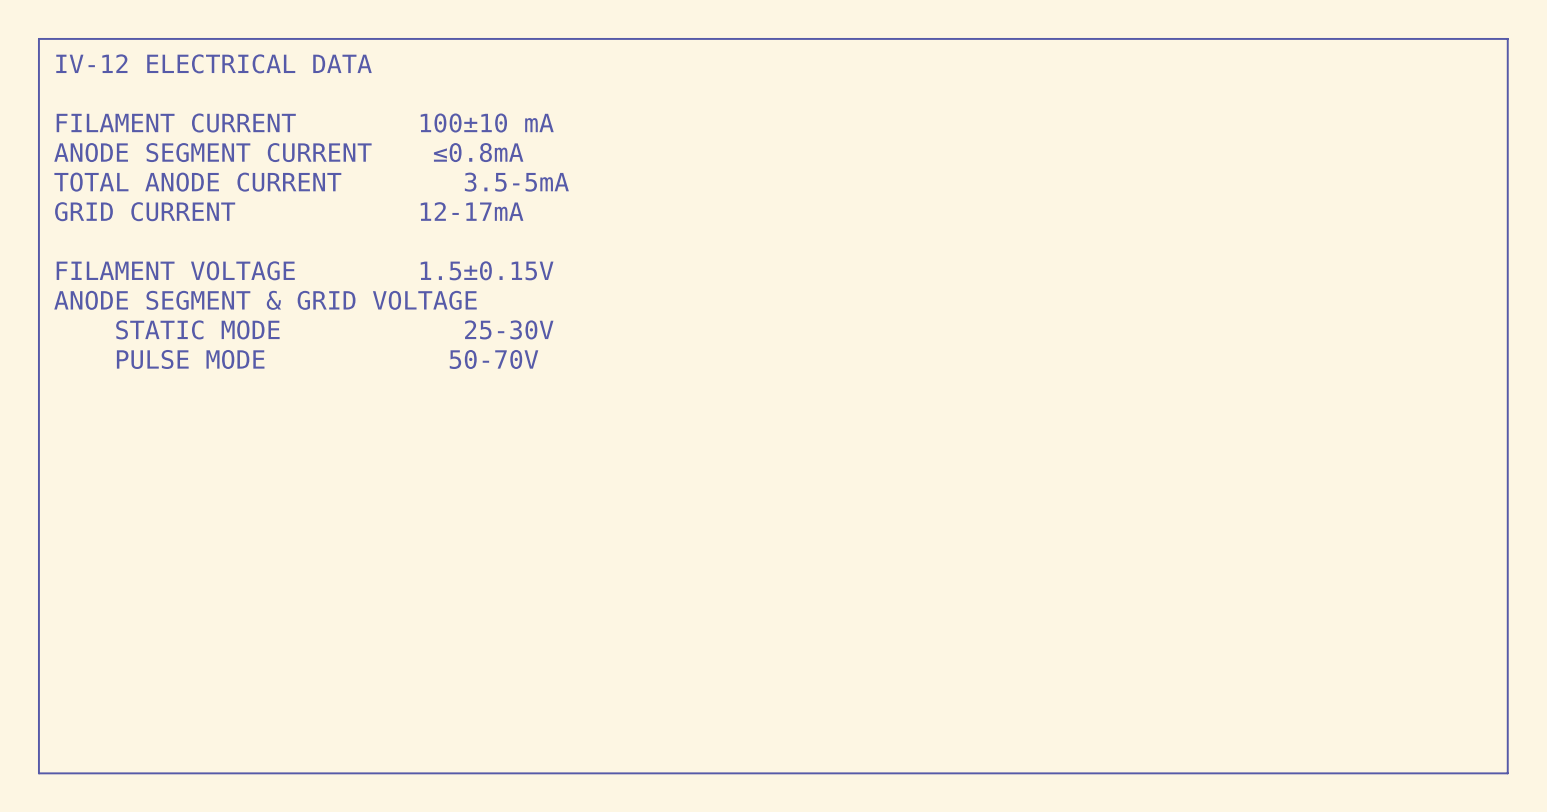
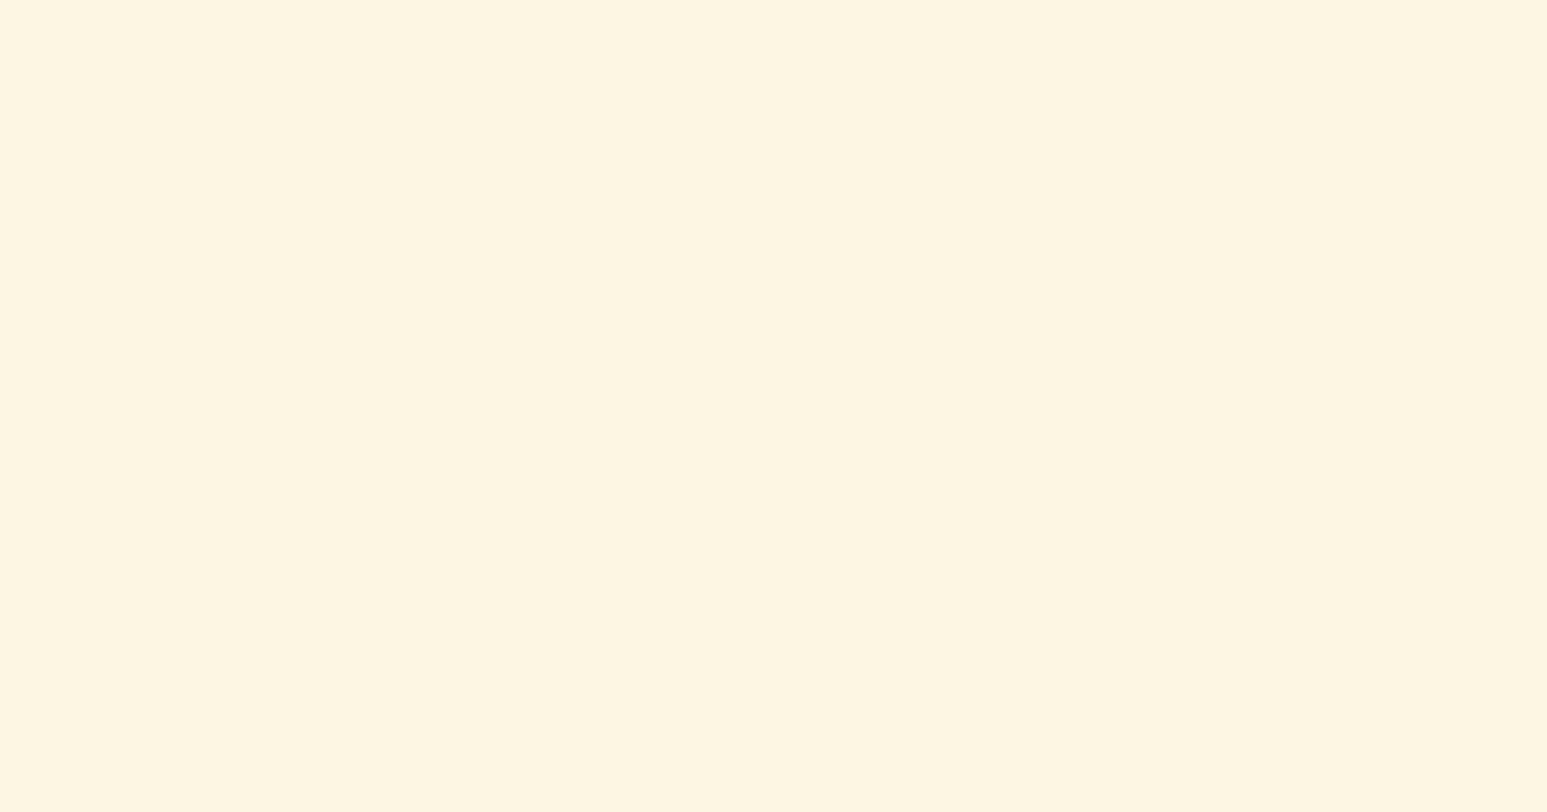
line: (38, 38) (1507, 38) (1507, 773) (38, 773) (38, 38) -> none
text: IV-12 ELECTRICAL DATA (214, 63) -> none
text: FILAMENT CURRENT 100±10 mA (305, 123) -> none
text: ANODE SEGMENT CURRENT ≤0.8mA (288, 152) -> none
text: TOTAL ANODE CURRENT 3.5-5mA (311, 182) -> none
text: GRID CURRENT 12-17mA (289, 211) -> none
text: FILAMENT VOLTAGE 1.5±0.15V (305, 270) -> none
text: ANODE SEGMENT & GRID VOLTAGE (265, 300) -> none
text: STATIC MODE 25-30V (334, 329) -> none
text: PULSE MODE 50-70V (327, 359) -> none

